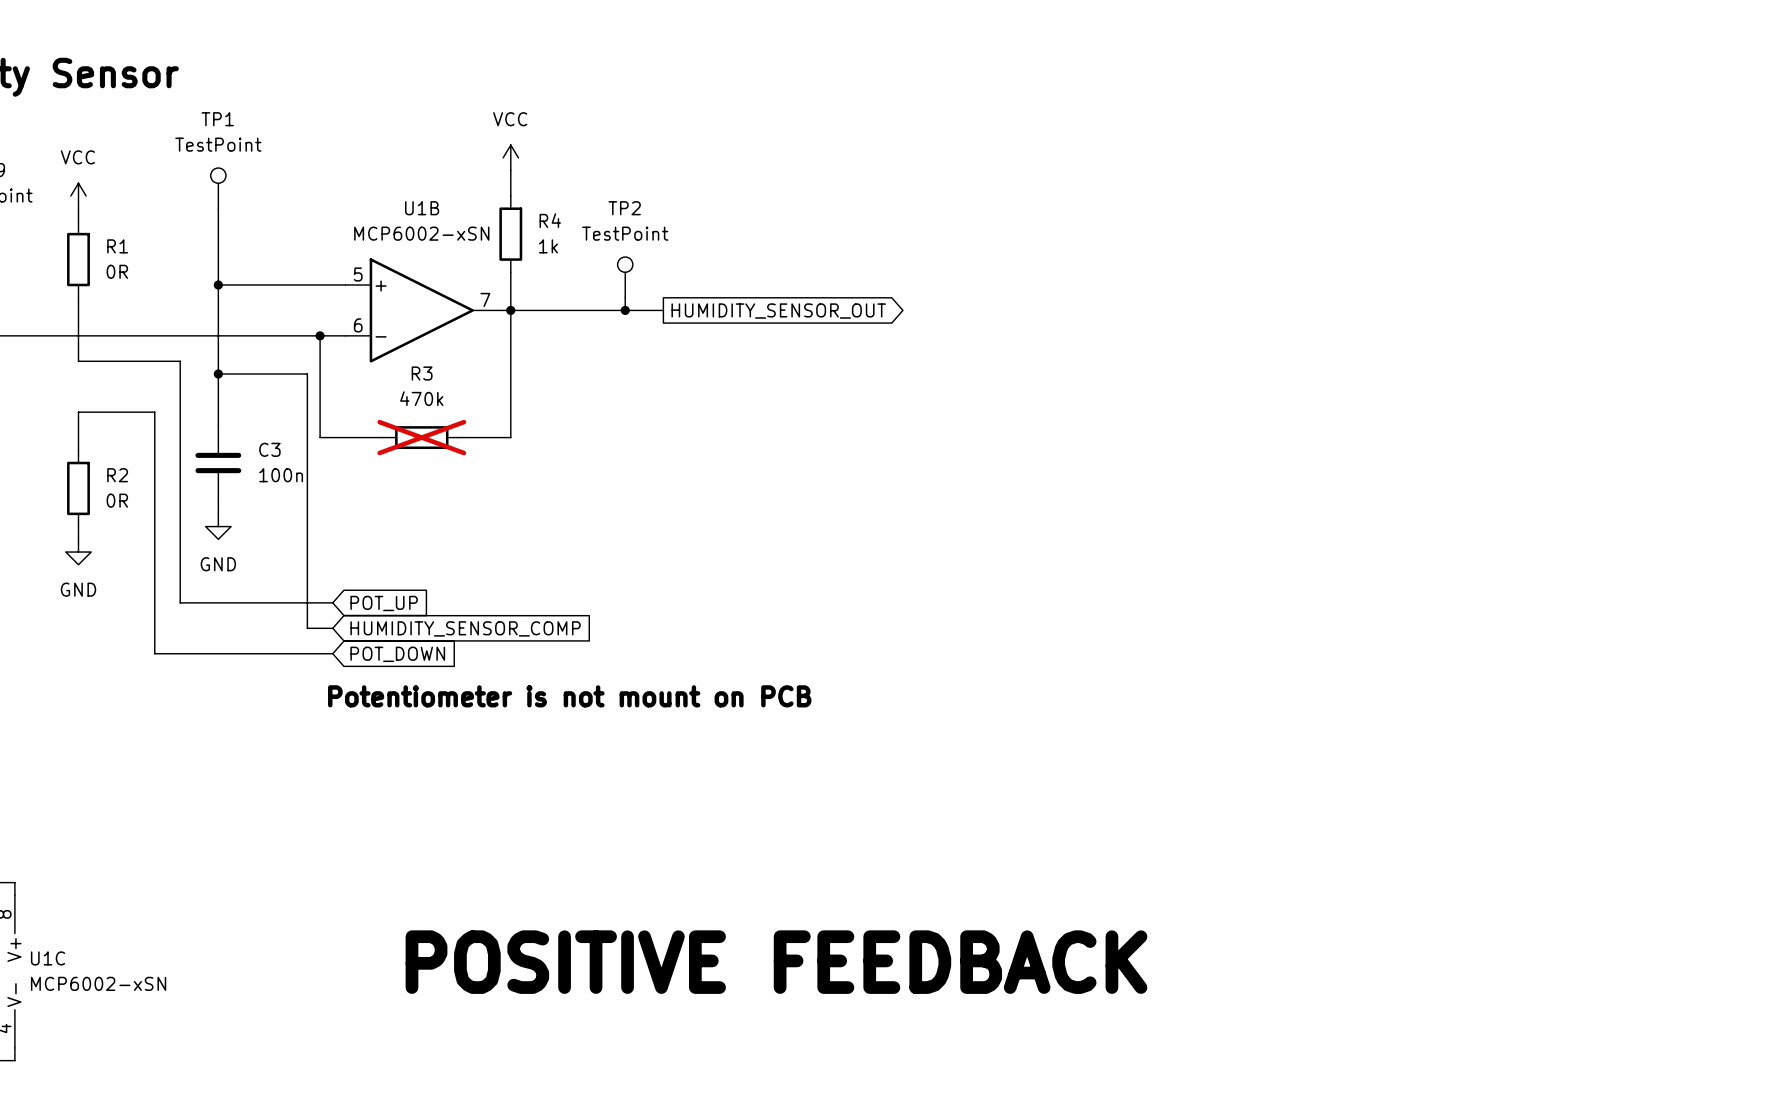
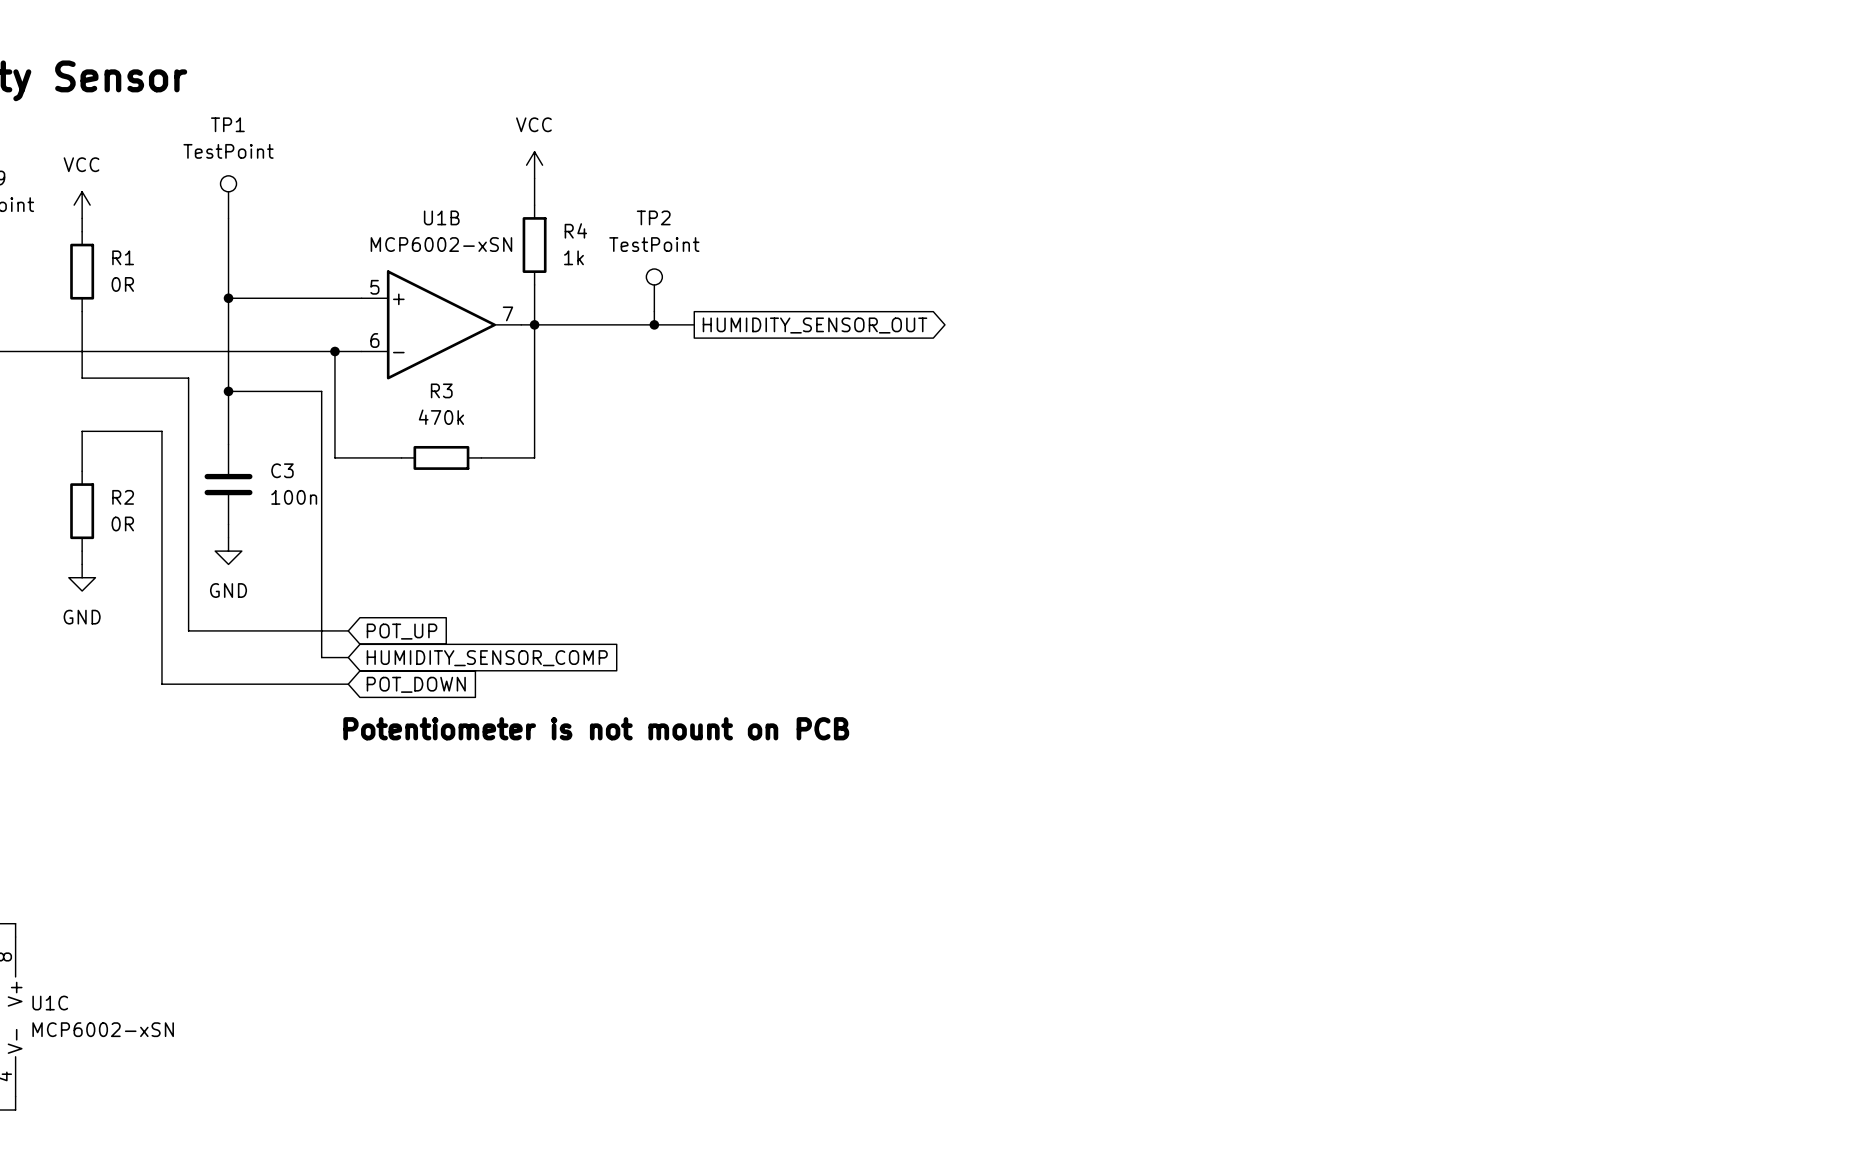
R3 do-not-place cross: (421, 437) -> none
text: POSITIVE FEEDBACK (776, 962) -> none

